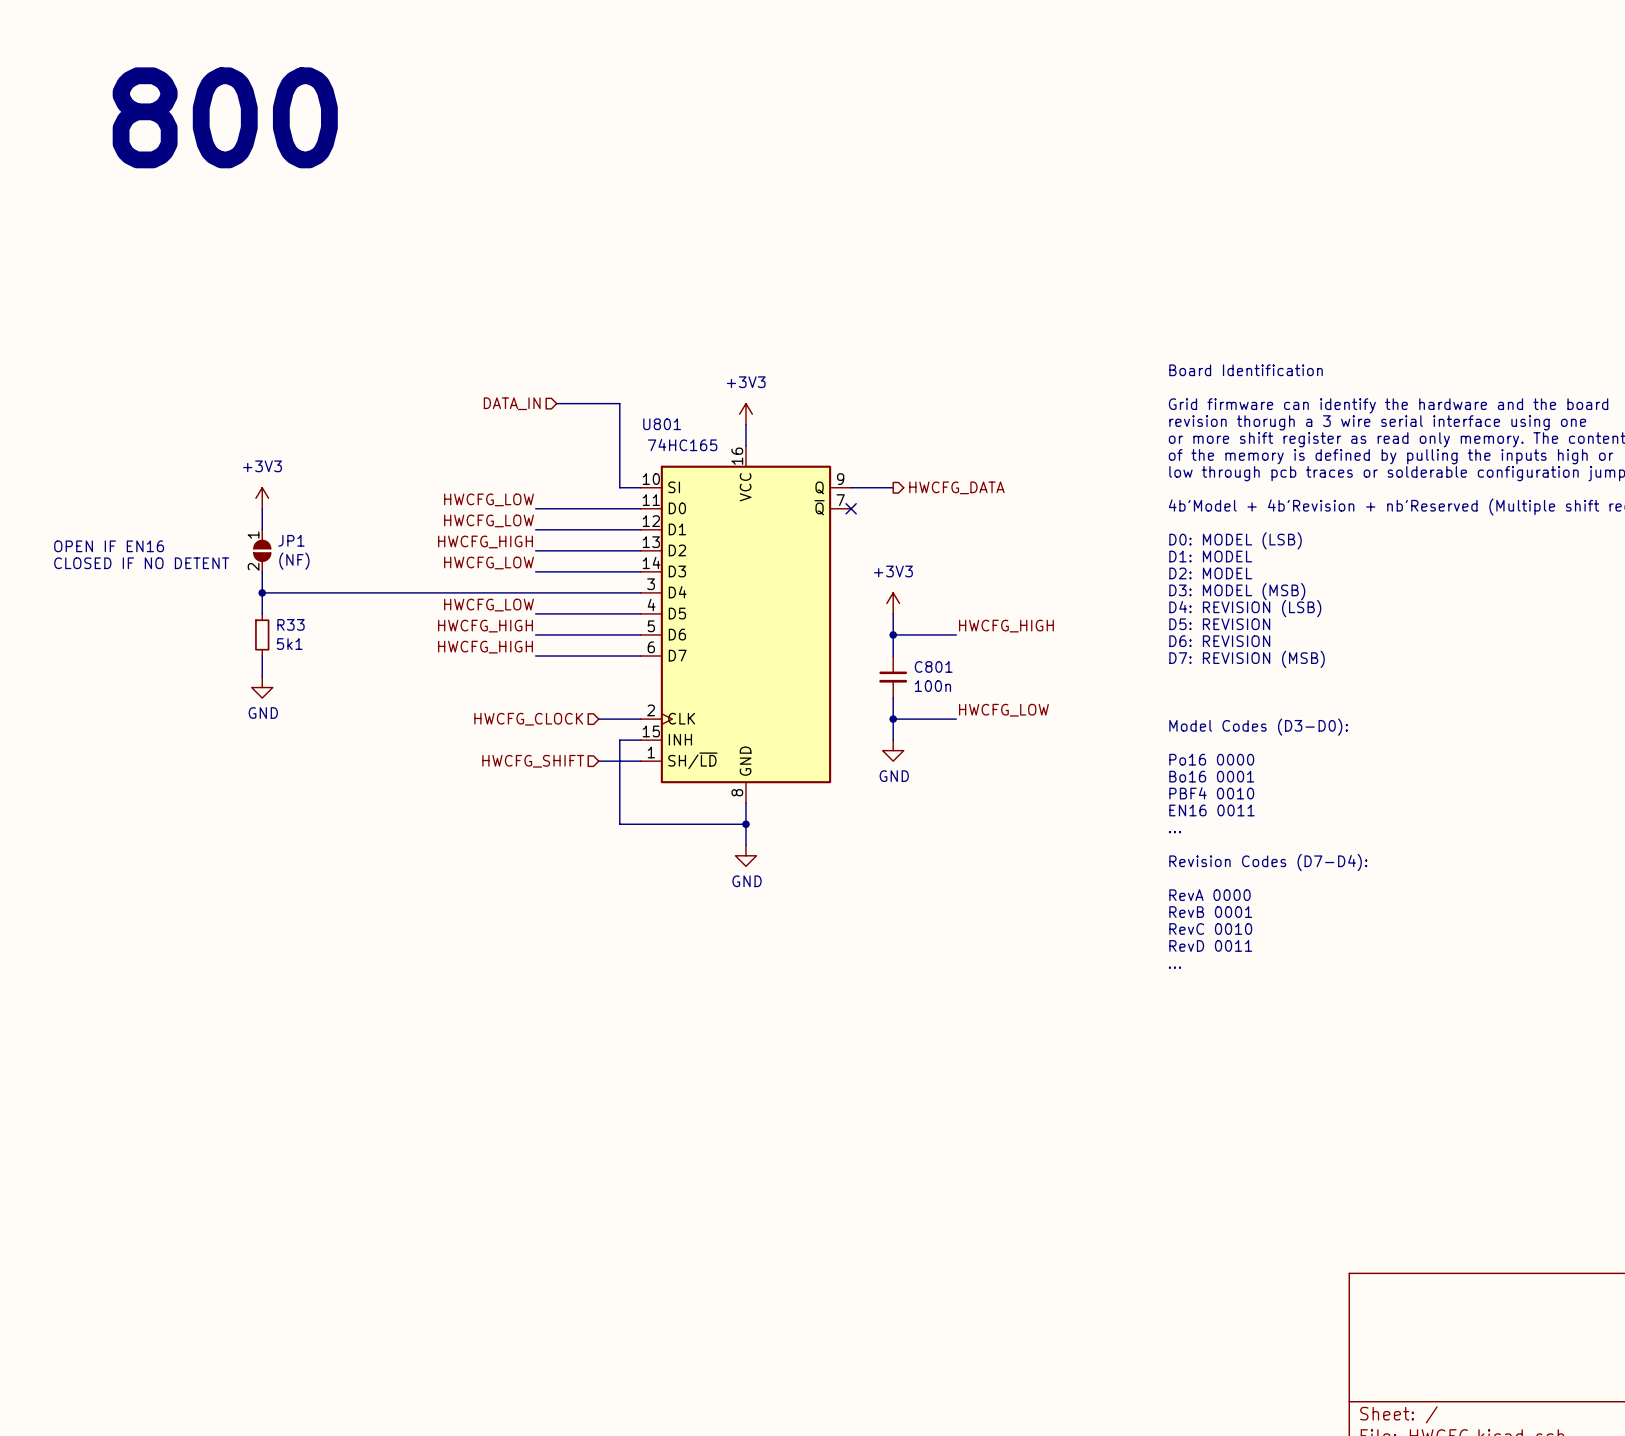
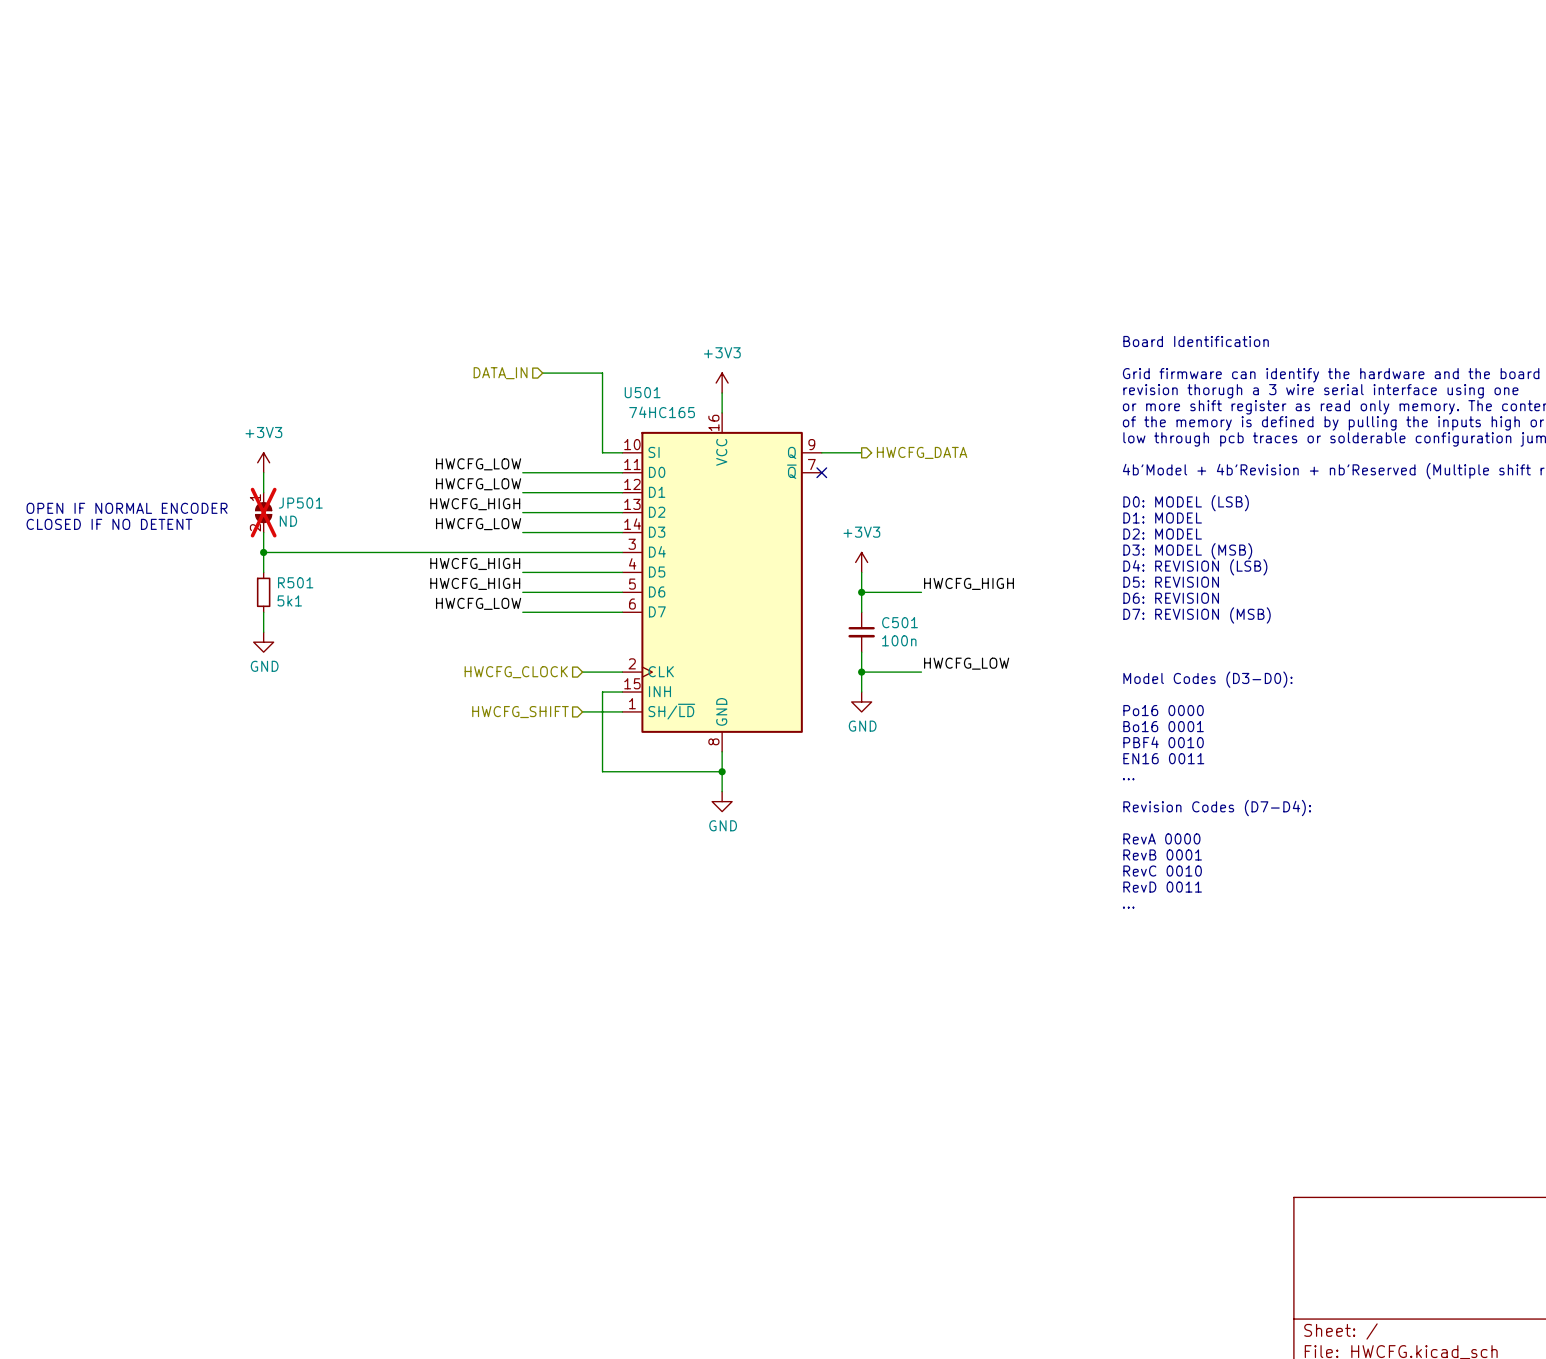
text: 800 (225, 117) -> none
U801 name: U801 (662, 424) -> U501 (642, 392)
JP1 name: JP1 (291, 540) -> JP501 (300, 503)
text: OPEN IF EN16 (109, 546) -> none
text: none -> OPEN IF NORMAL ENCODER (127, 508)
JP1 do-not-place cross: none -> (263, 512)
JP1 value: (NF) (294, 561) -> ND (288, 521)
text position: CLOSED IF NO DETENT (141, 563) -> CLOSED IF NO DETENT (109, 524)
label: HWCFG_LOW (489, 605) -> HWCFG_HIGH (475, 563)
R33 name: R33 (291, 624) -> R501 (295, 582)
label: HWCFG_HIGH (485, 647) -> HWCFG_LOW (478, 603)
C801 name: C801 (933, 666) -> C501 (900, 622)

